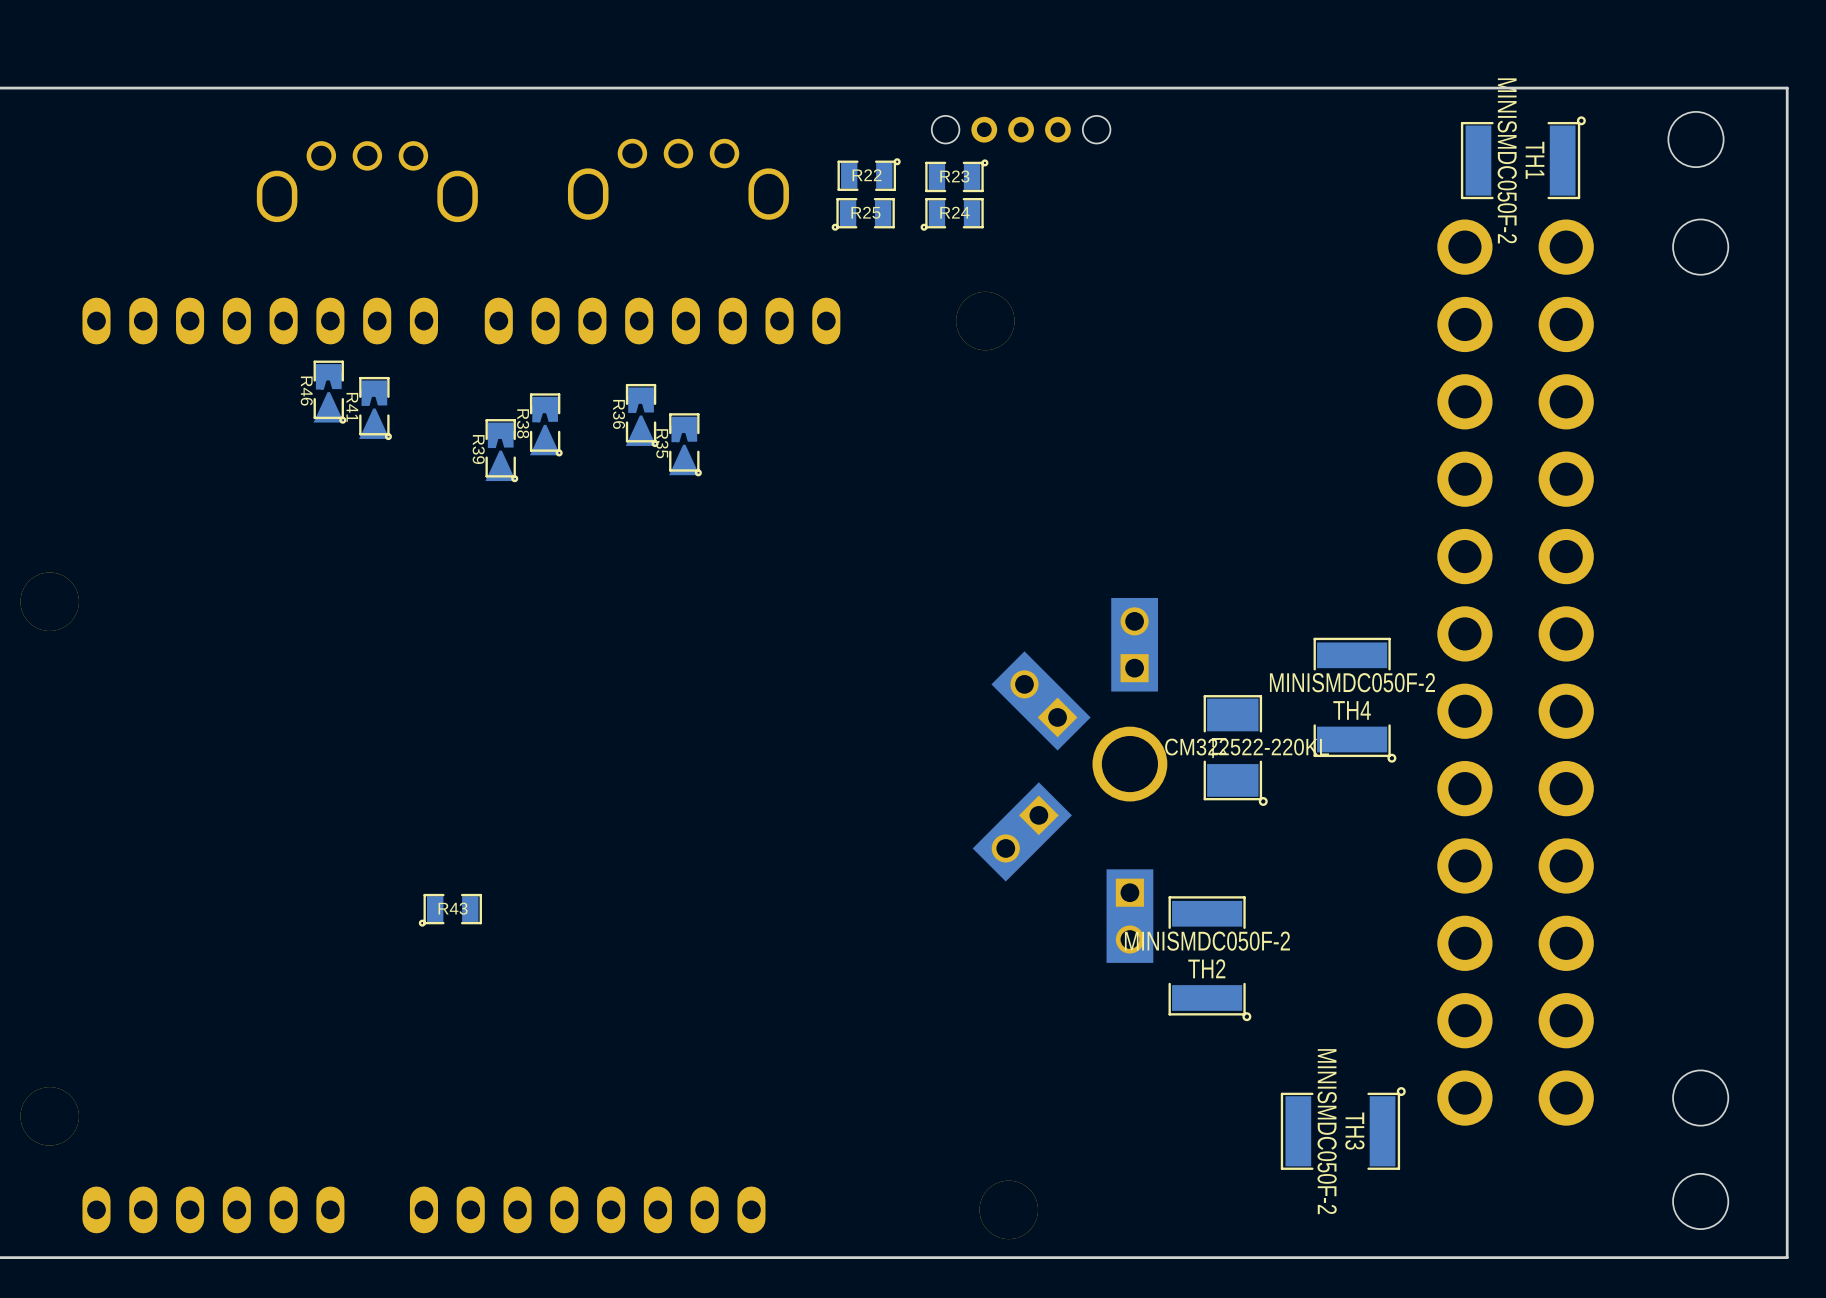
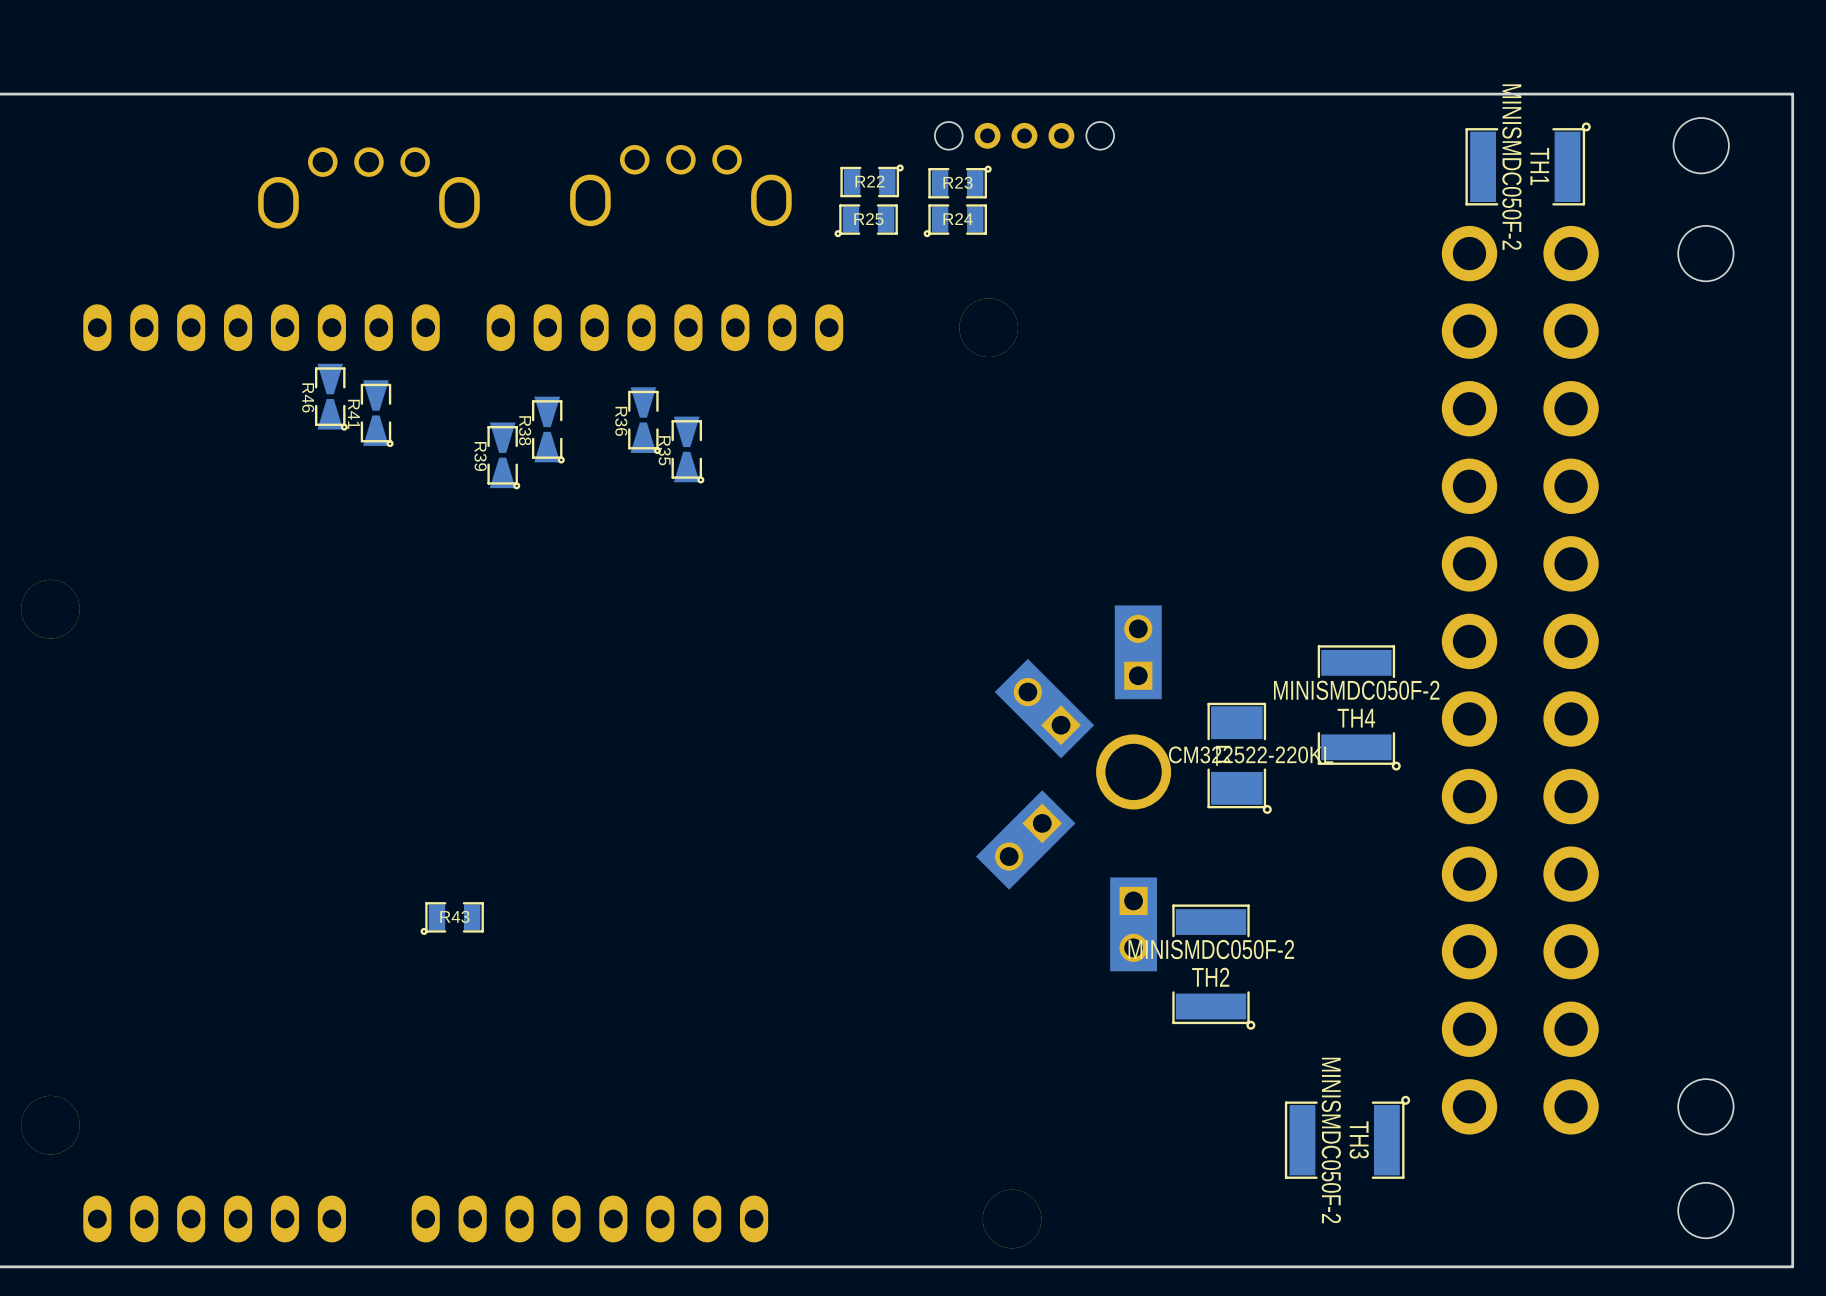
R46 footprint: [313, 360, 347, 424] -> [315, 363, 348, 431]
R41 footprint: [359, 376, 392, 441] -> [360, 380, 394, 448]
R36 footprint: [625, 383, 659, 448] -> [628, 387, 661, 455]
R38 footprint: [529, 393, 563, 457] -> [531, 396, 565, 464]
R35 footprint: [669, 413, 702, 477] -> [671, 416, 705, 484]
R39 footprint: [485, 419, 519, 483] -> [487, 422, 521, 490]

